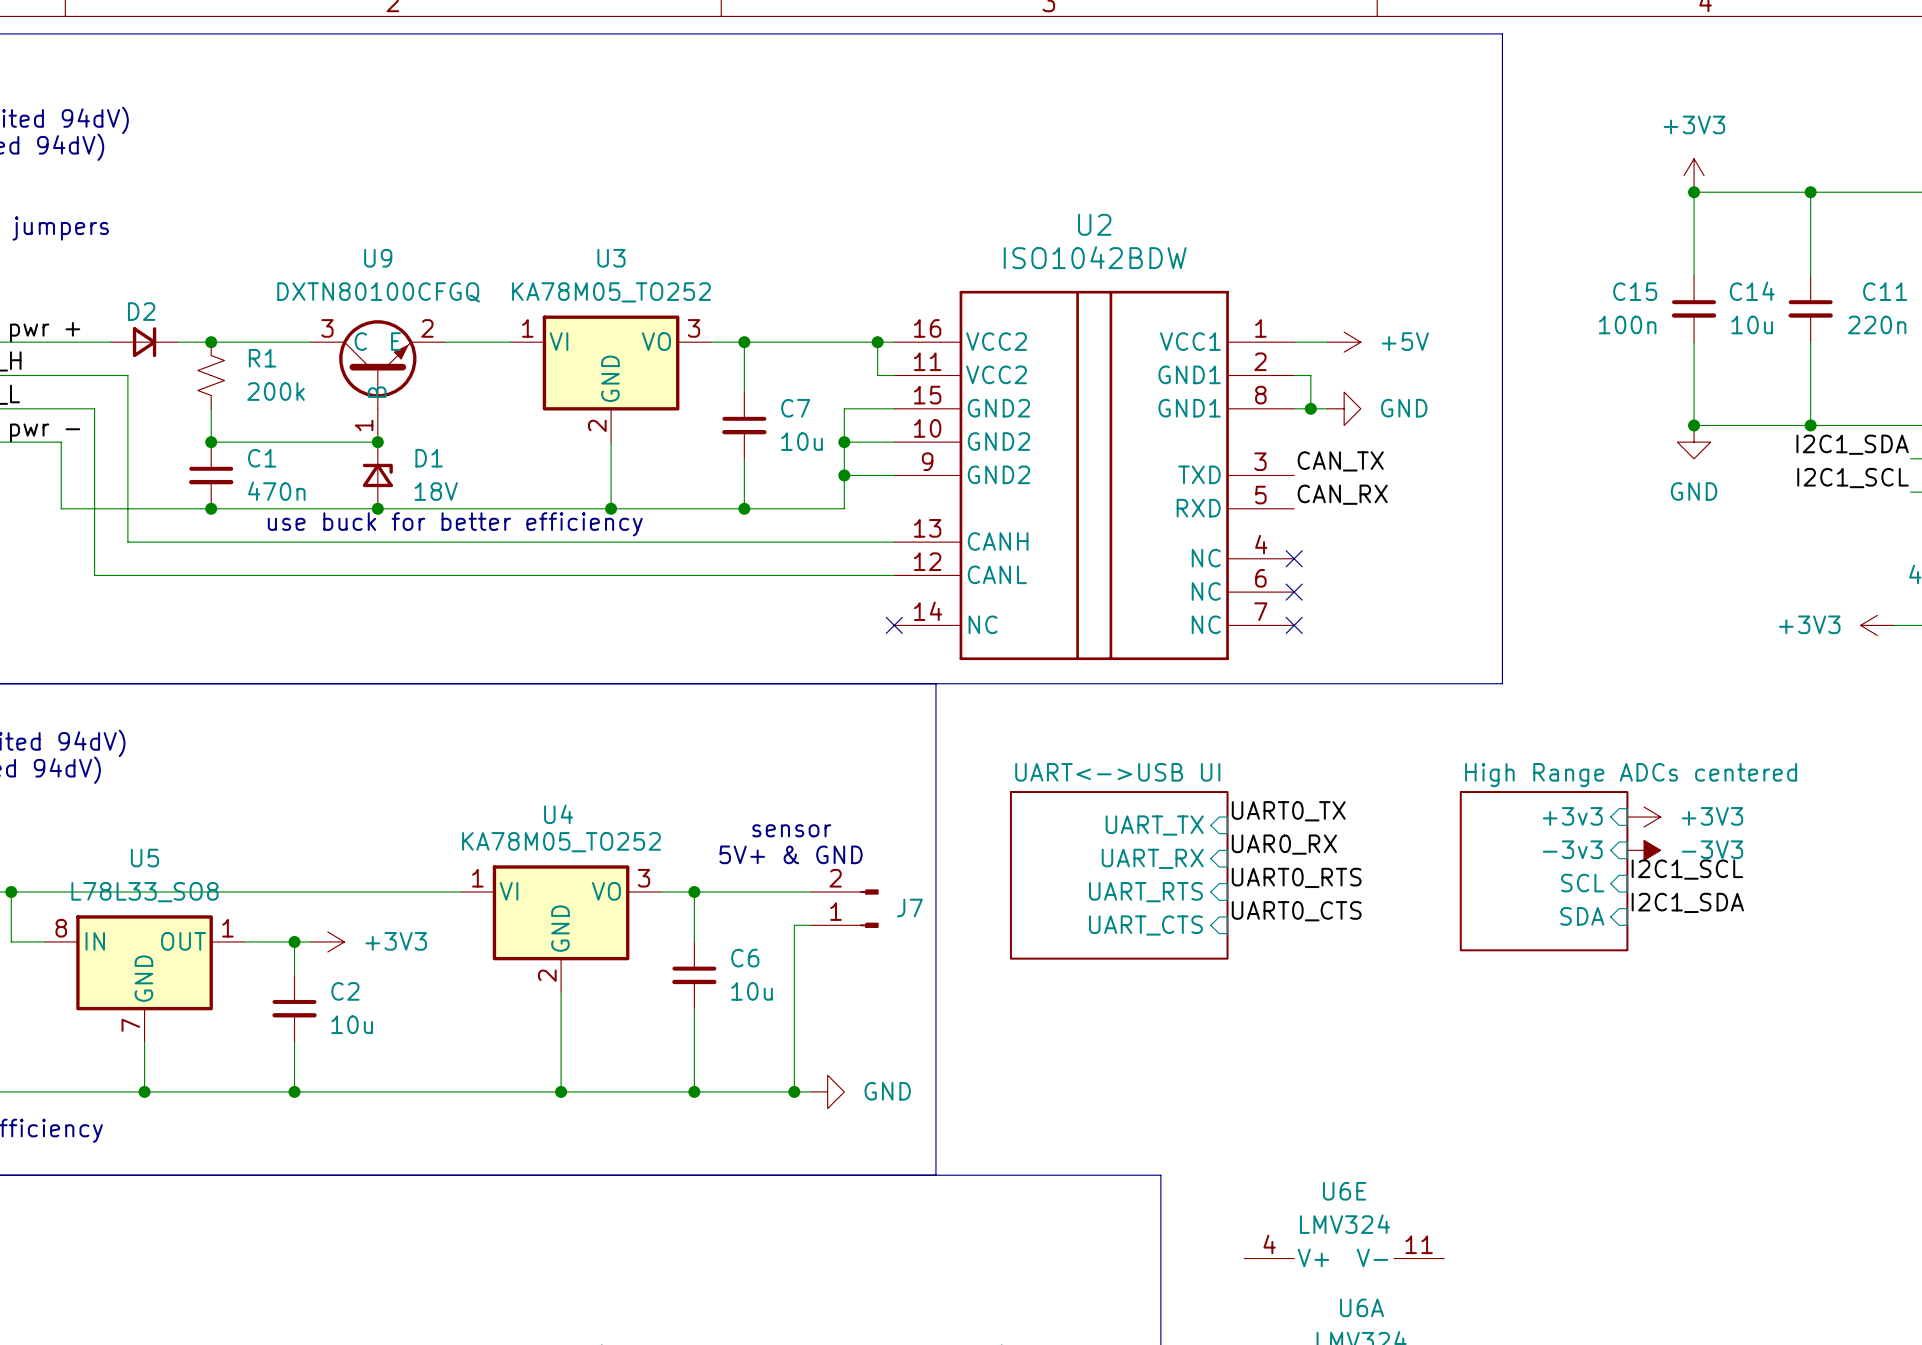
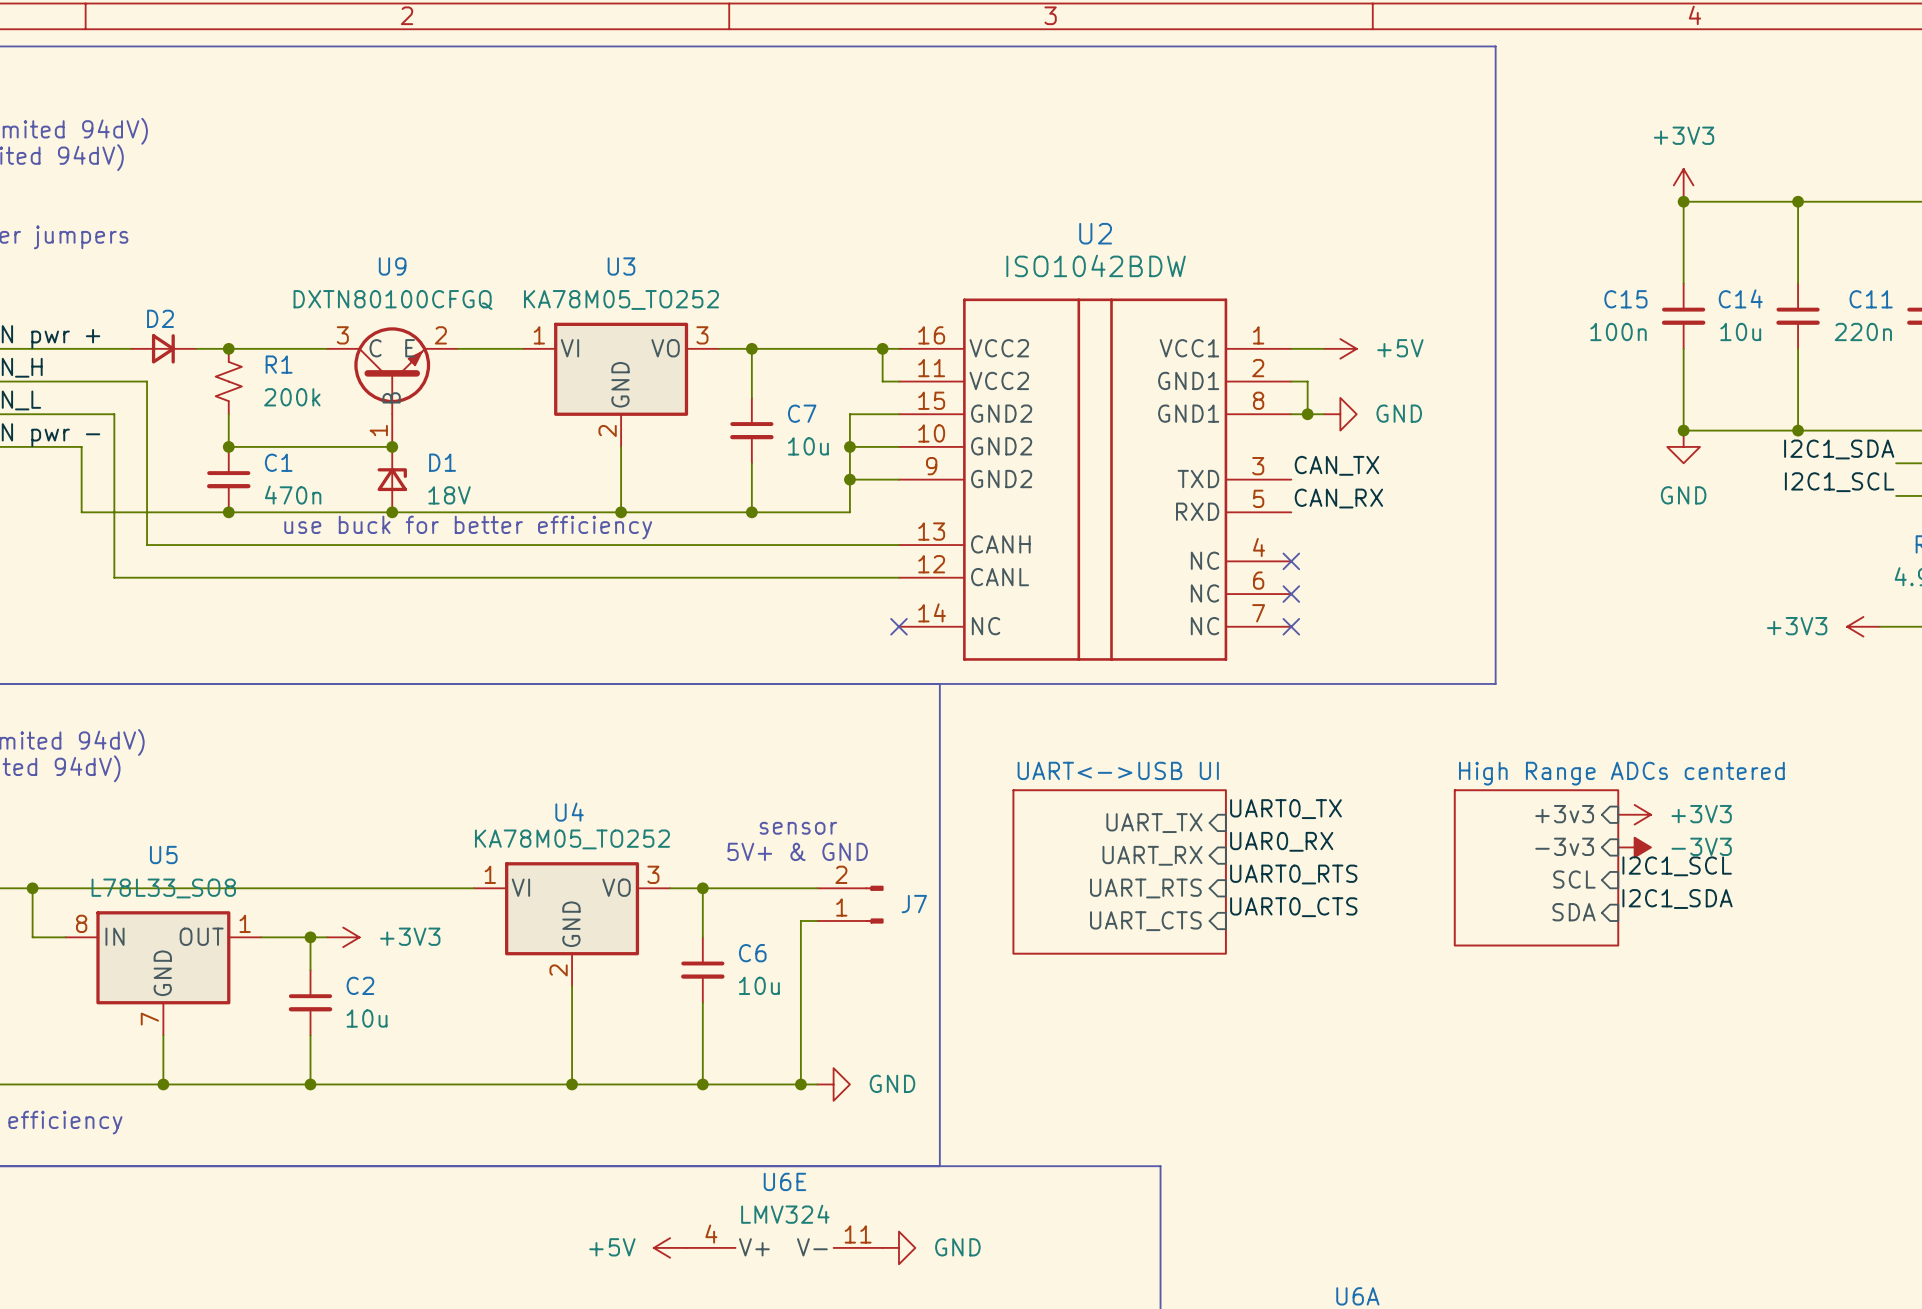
power symbol: none -> +5V (670, 1247)
power symbol: none -> GND (898, 1247)
U6E position: (1344, 1258) -> (784, 1247)

